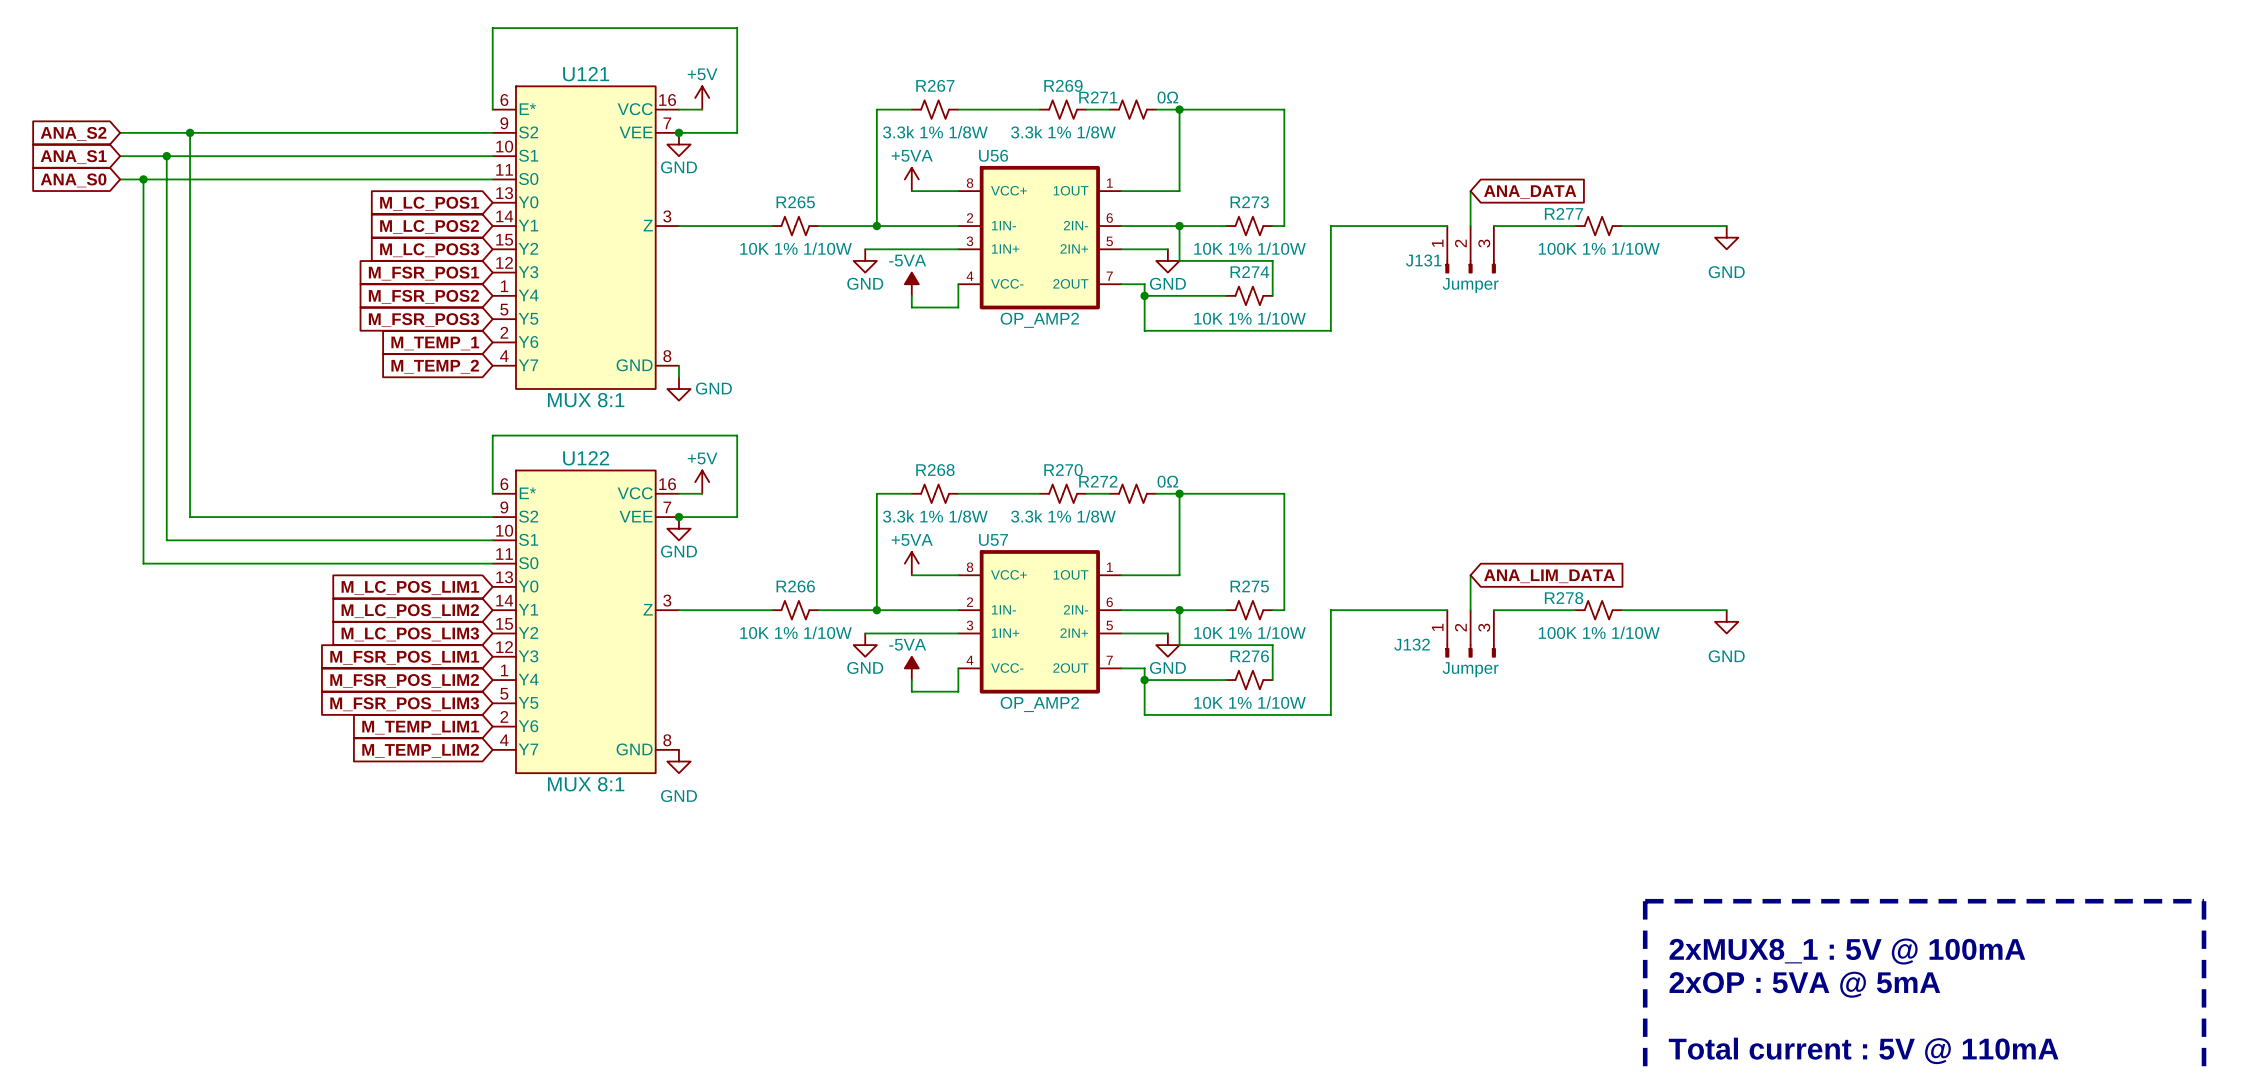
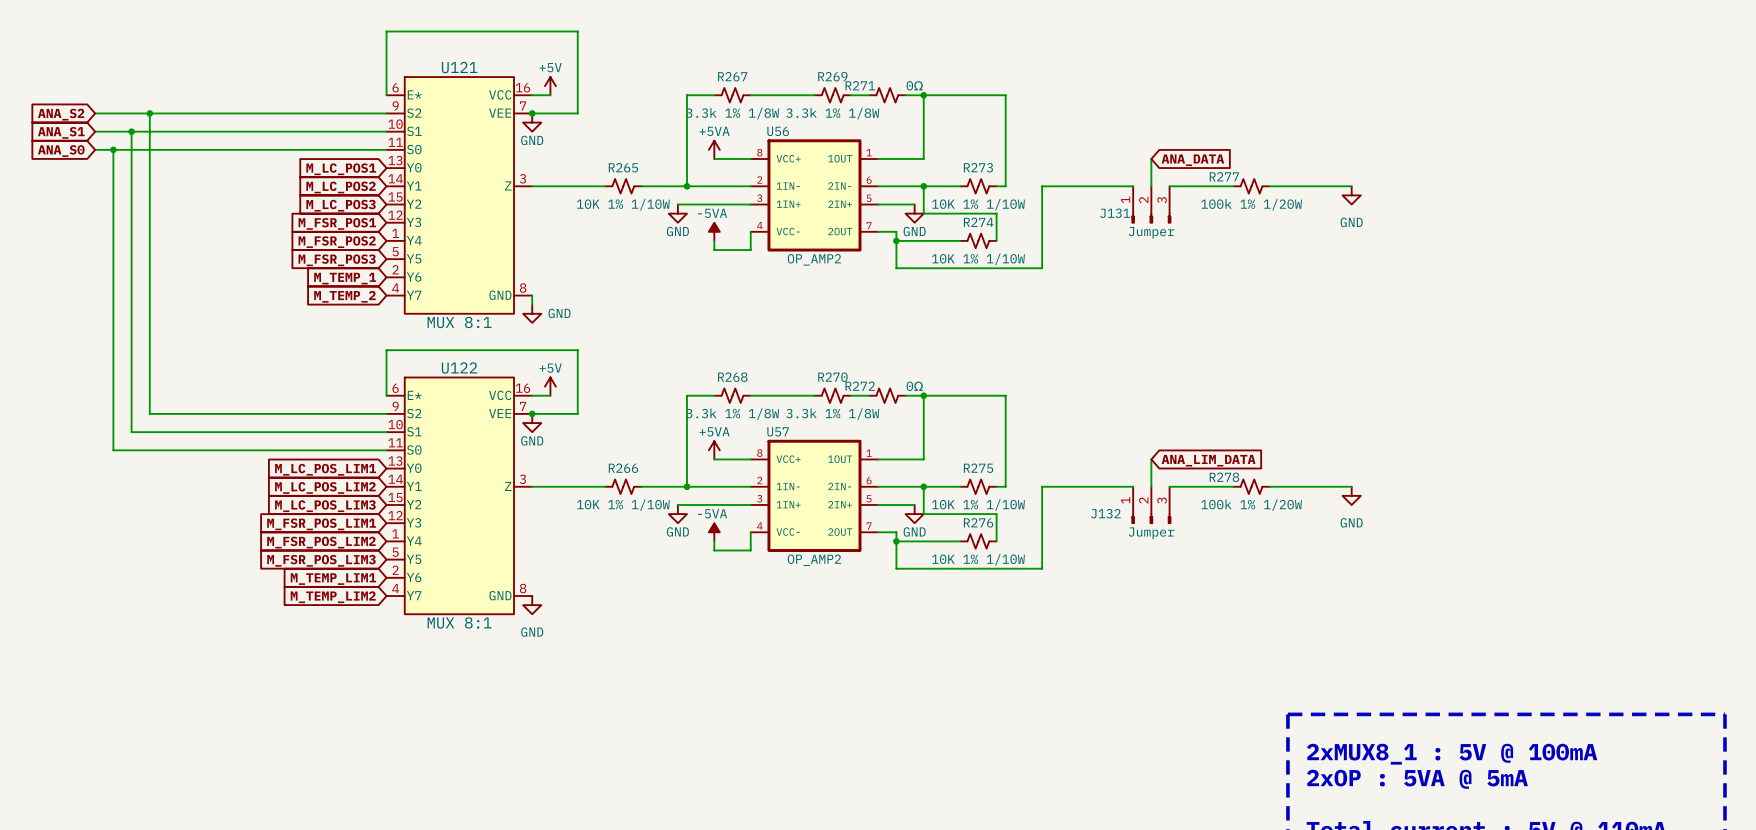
R277 value: 100K 1% 1/10W (1599, 248) -> 100k 1% 1/20W (1251, 204)
R278 value: 100K 1% 1/10W (1599, 632) -> 100k 1% 1/20W (1251, 505)

